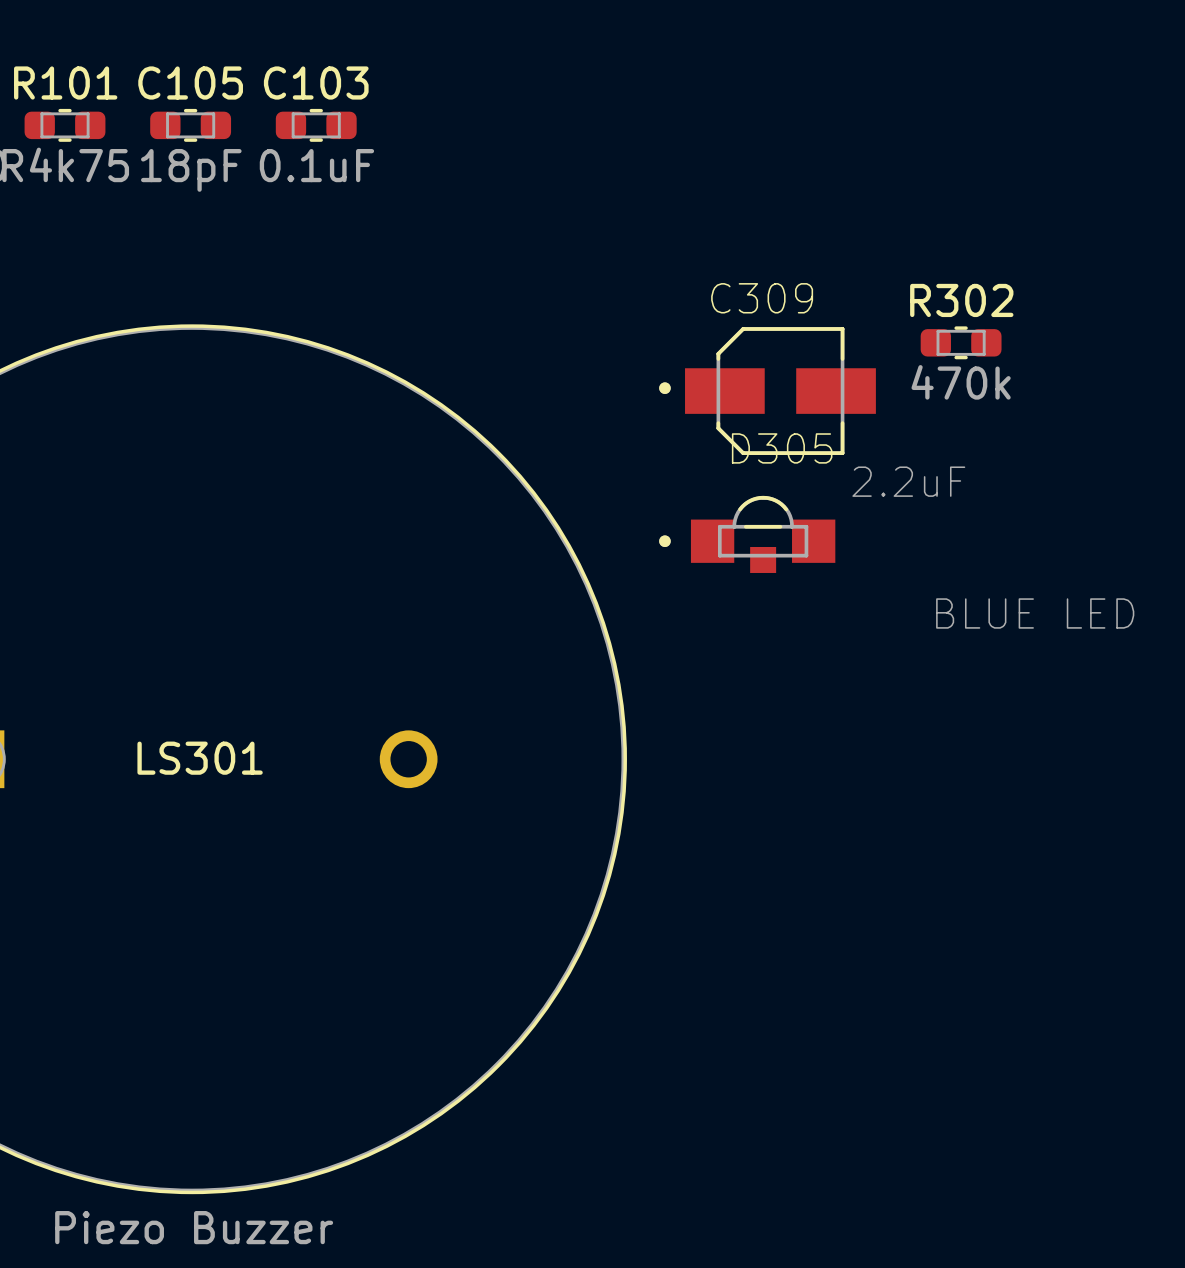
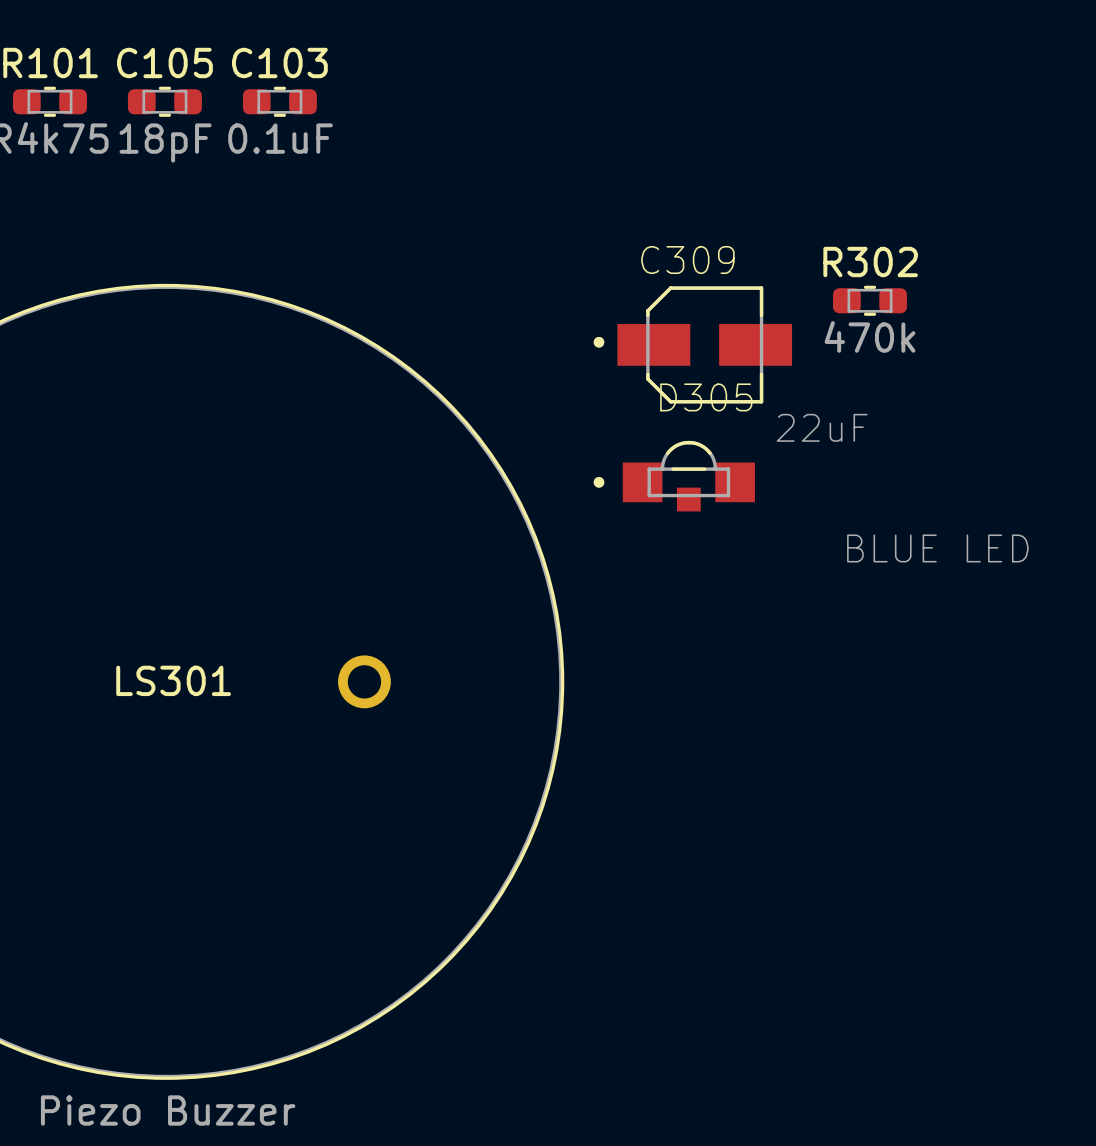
C309 value: 2.2uF (908, 481) -> 22uF (822, 427)

